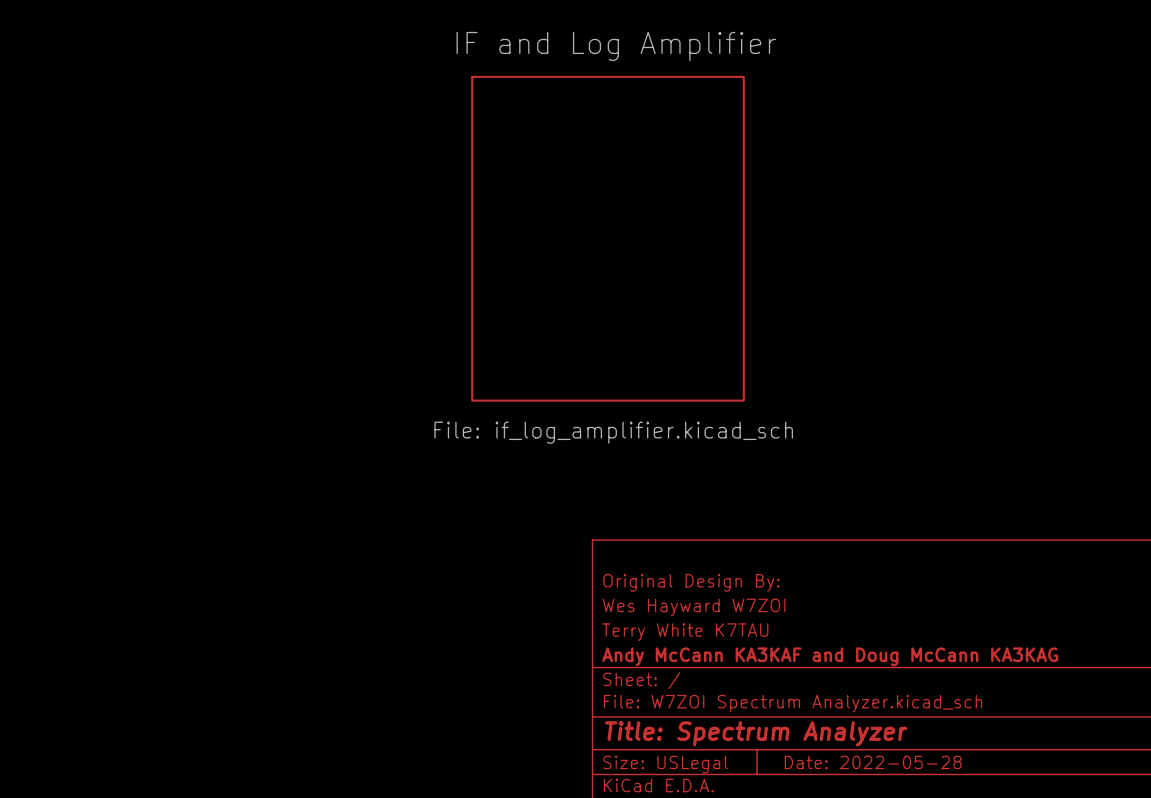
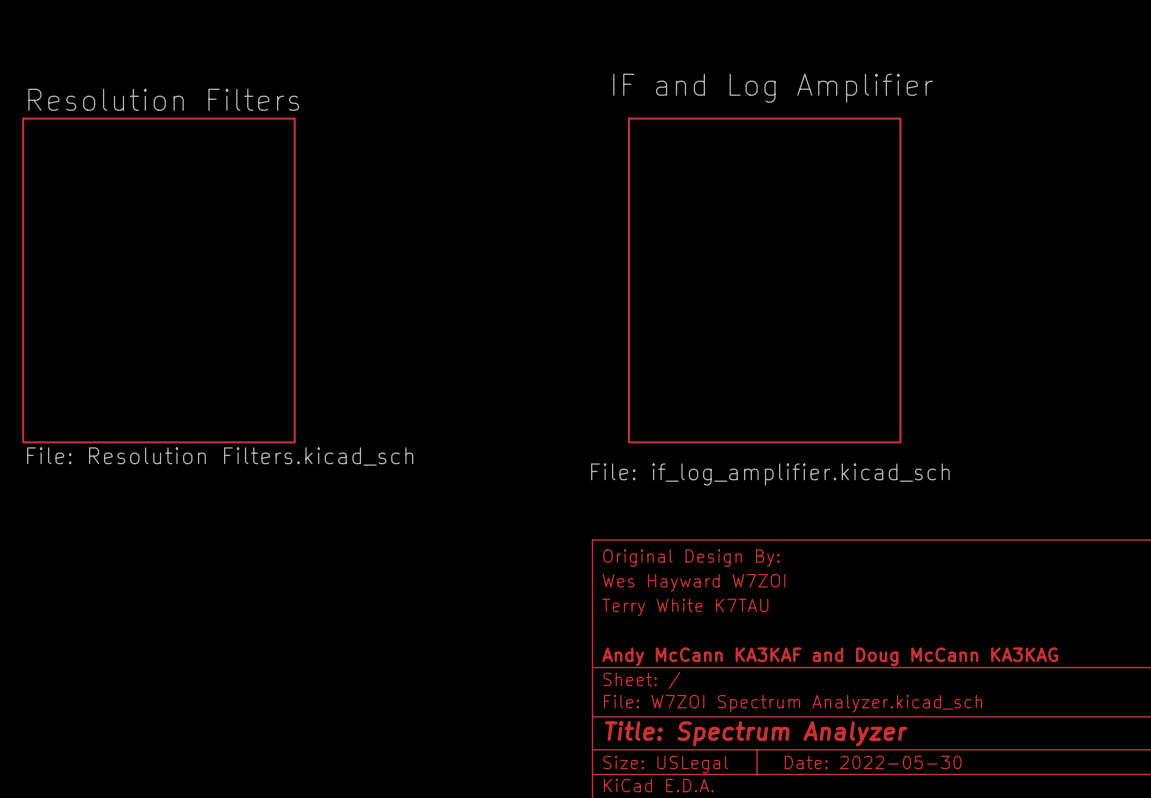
sheet IF and Log Amplifier position: (608, 238) -> (764, 280)
sheet Resolution Filters: none -> File: Resolution Filters.kicad_sch (158, 280)
title block: none -> Original Design By: (691, 558)
title block: Original Design By: (691, 582) -> Wes Hayward W7ZOI (694, 582)
title block: Wes Hayward W7ZOI (694, 607) -> Terry White K7TAU (685, 607)
title block: Terry White K7TAU (685, 632) -> none
title block: Date: 2022-05-28 (873, 762) -> Date: 2022-05-30 (873, 762)

